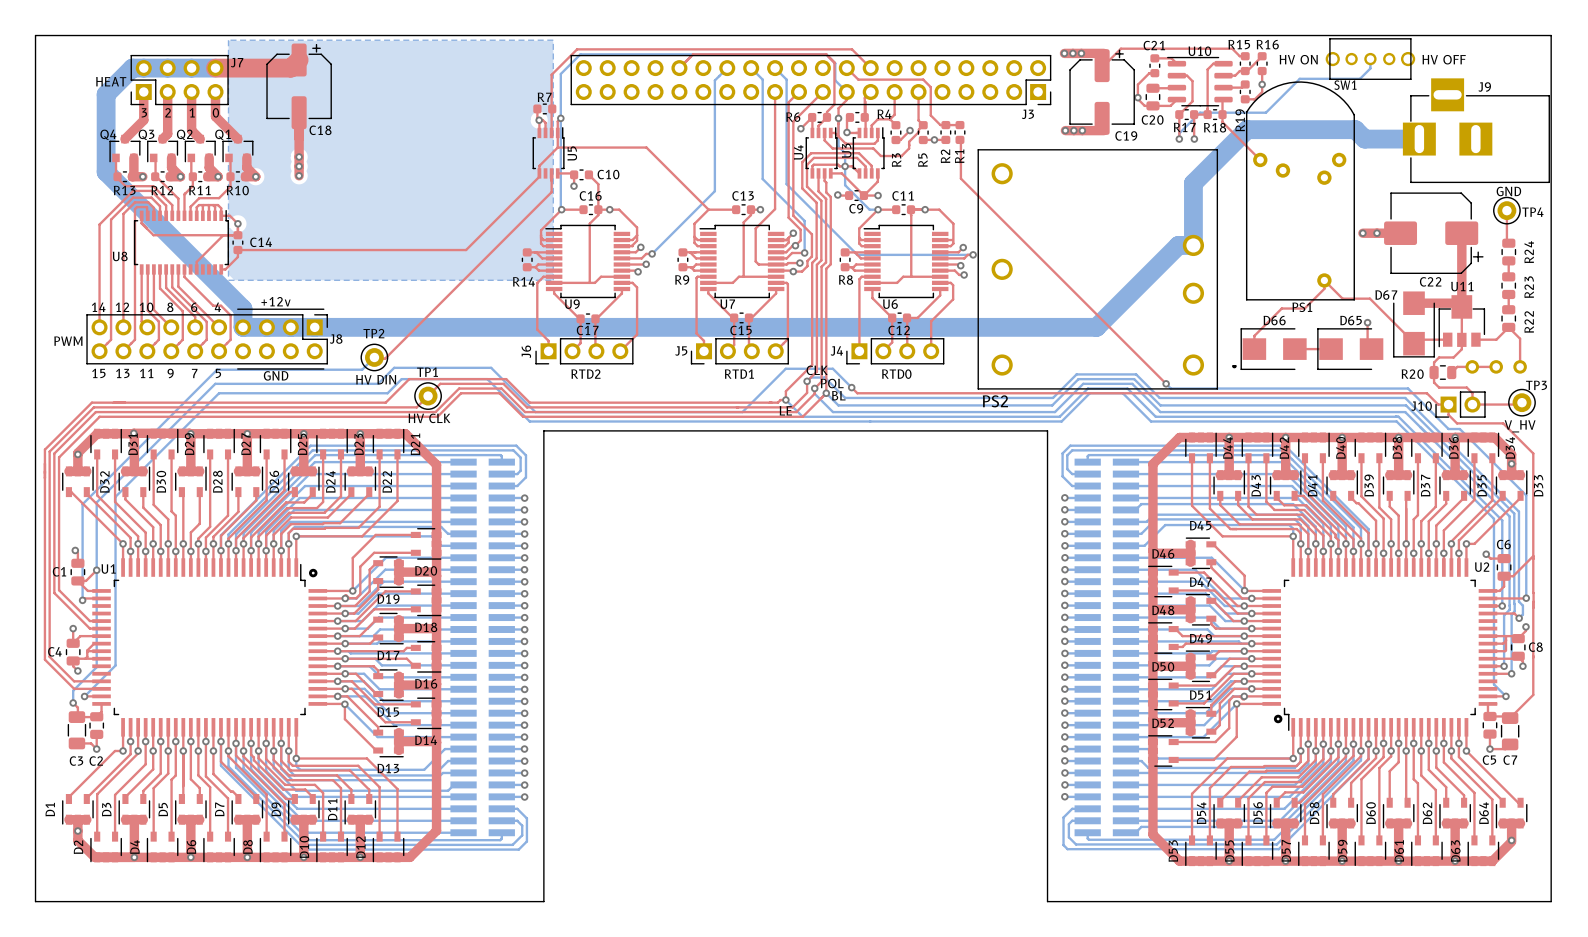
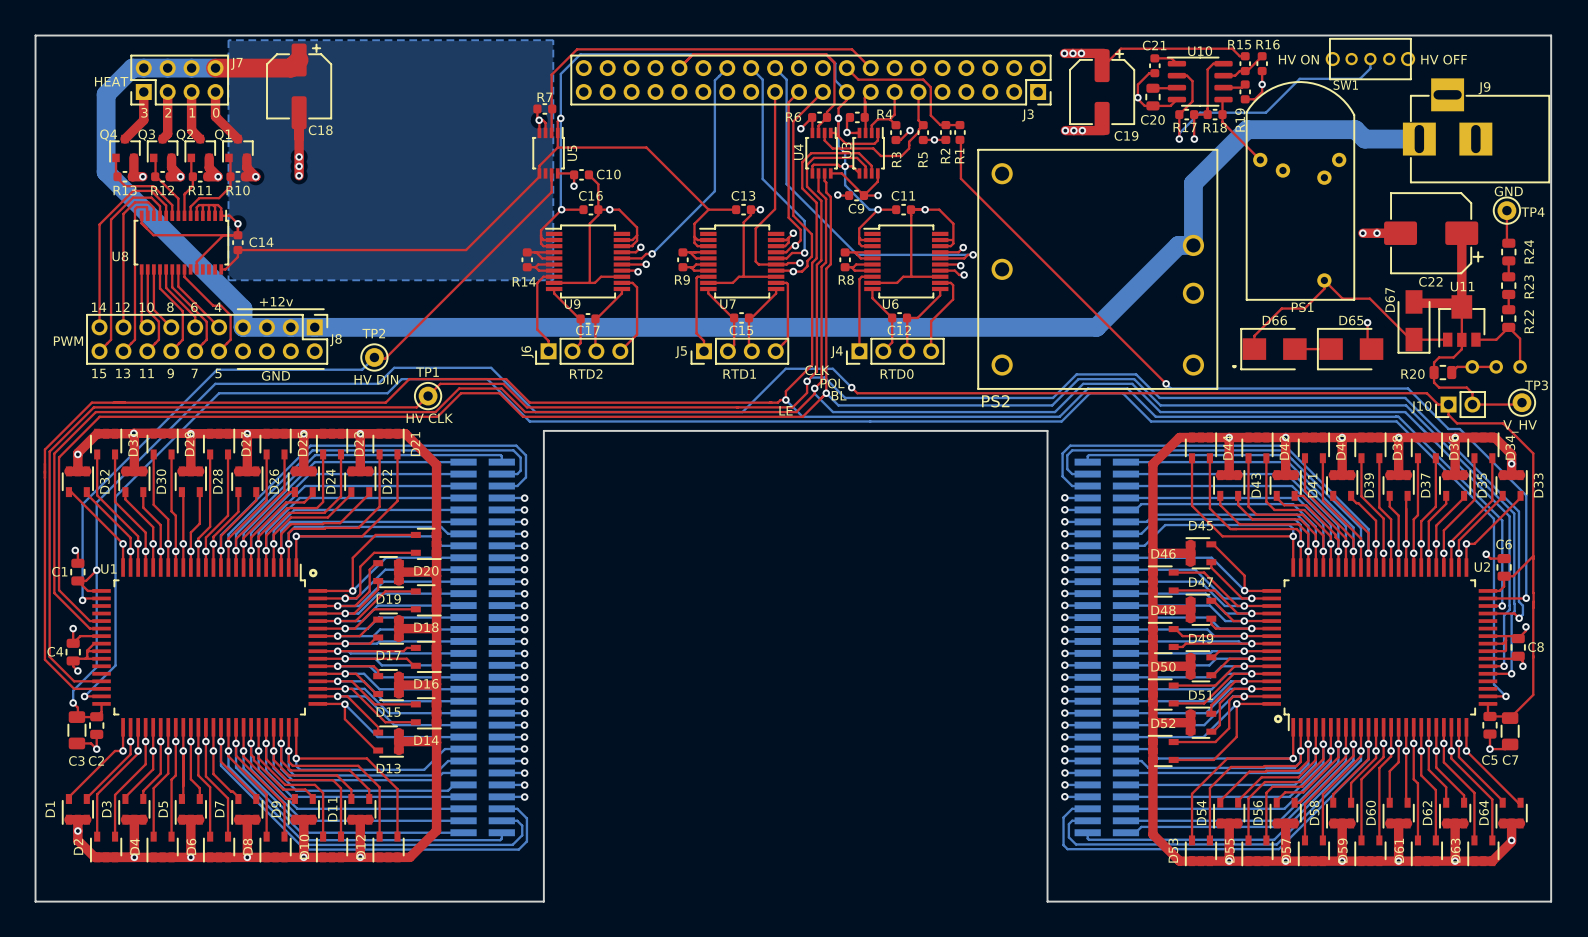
D67 footprint: [1393, 291, 1435, 358] -> [1397, 290, 1431, 354]
D67 name rotation: 0° (1386, 295) -> 90° counterclockwise (1390, 299)

